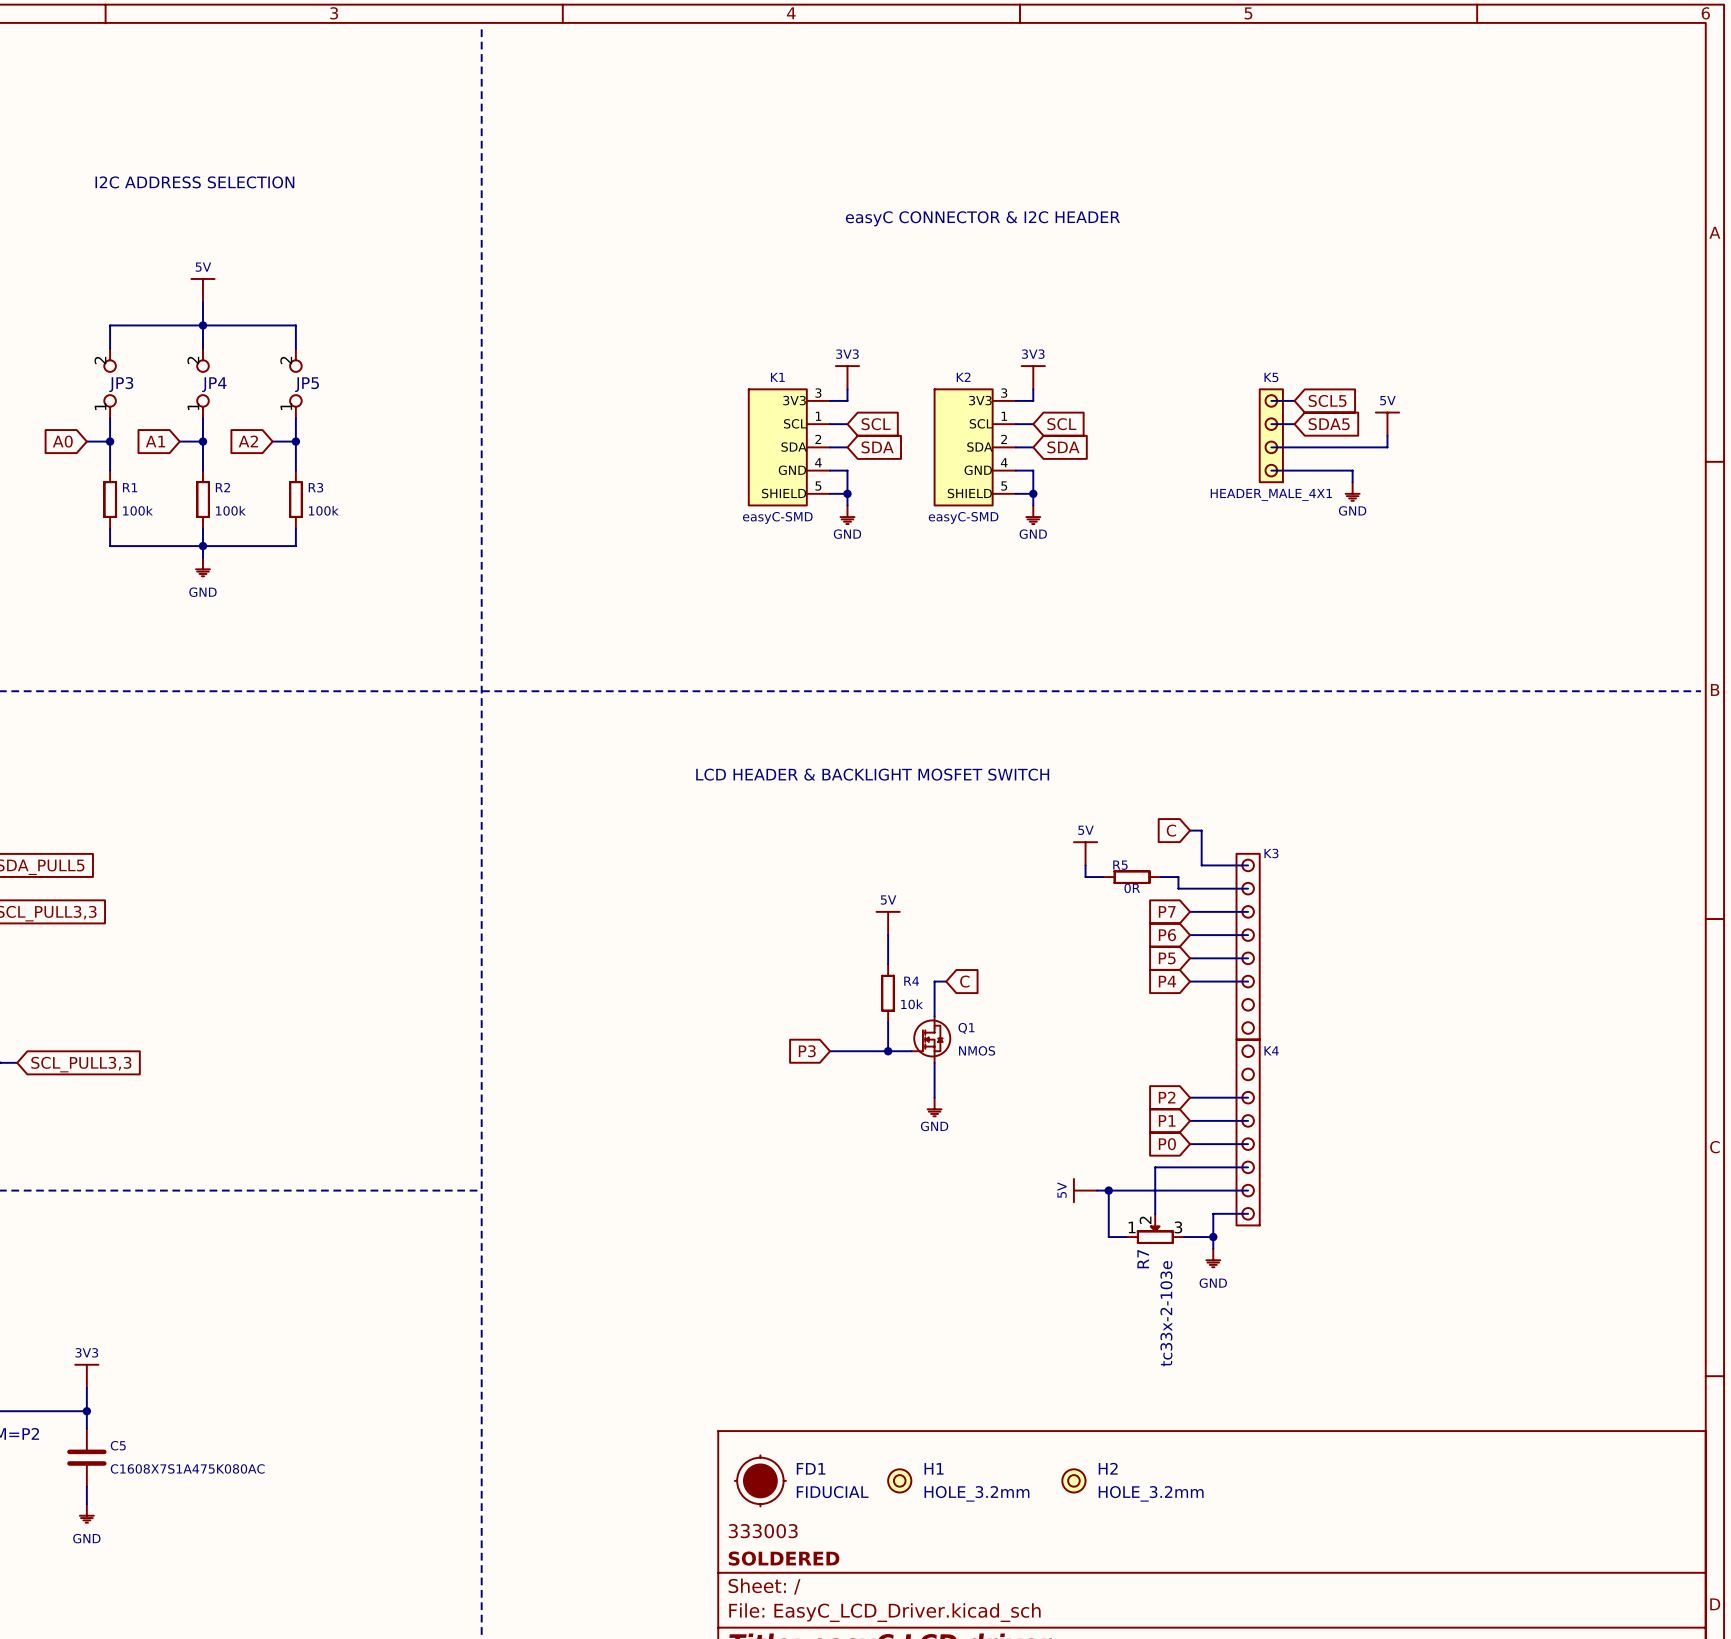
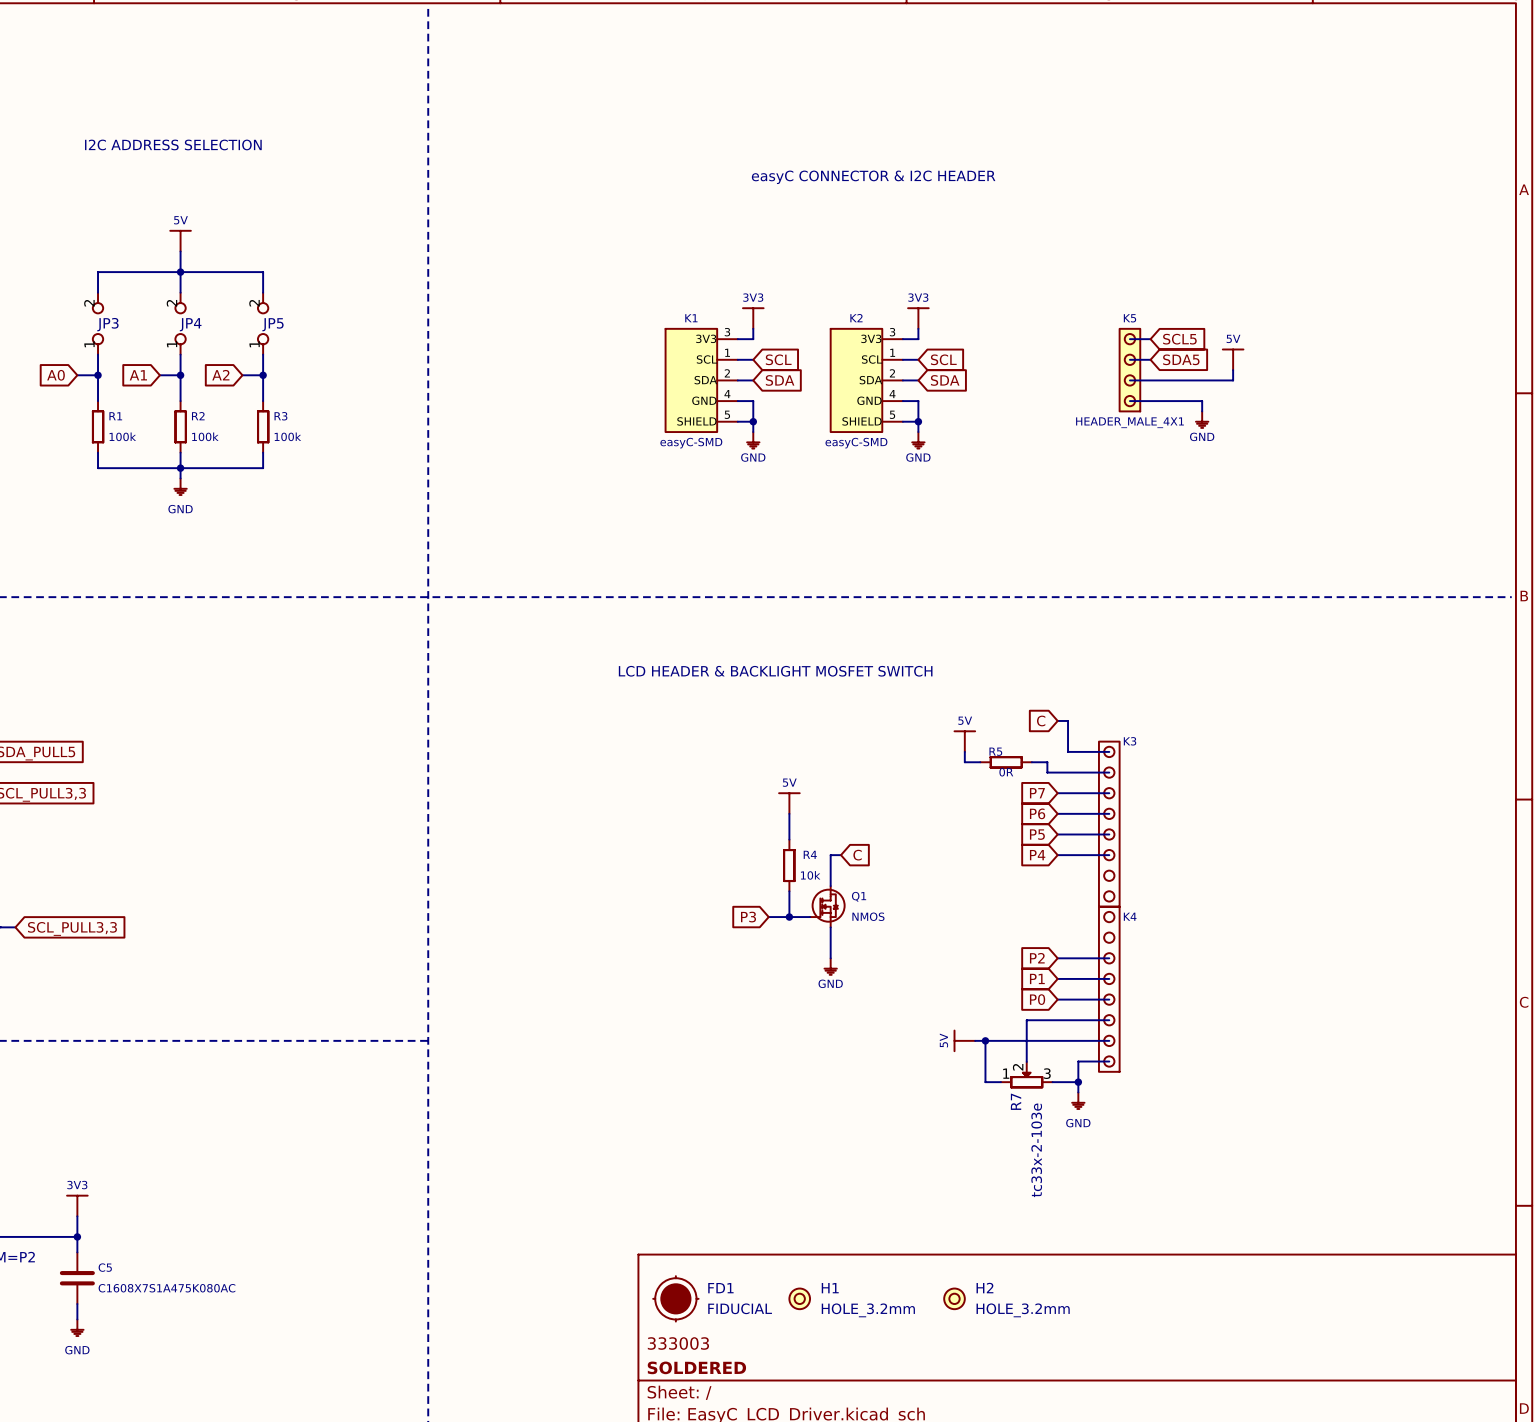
global label position: P3 (807, 1051) -> P3 (748, 917)
wire: (830, 1051) (864, 1051) -> none

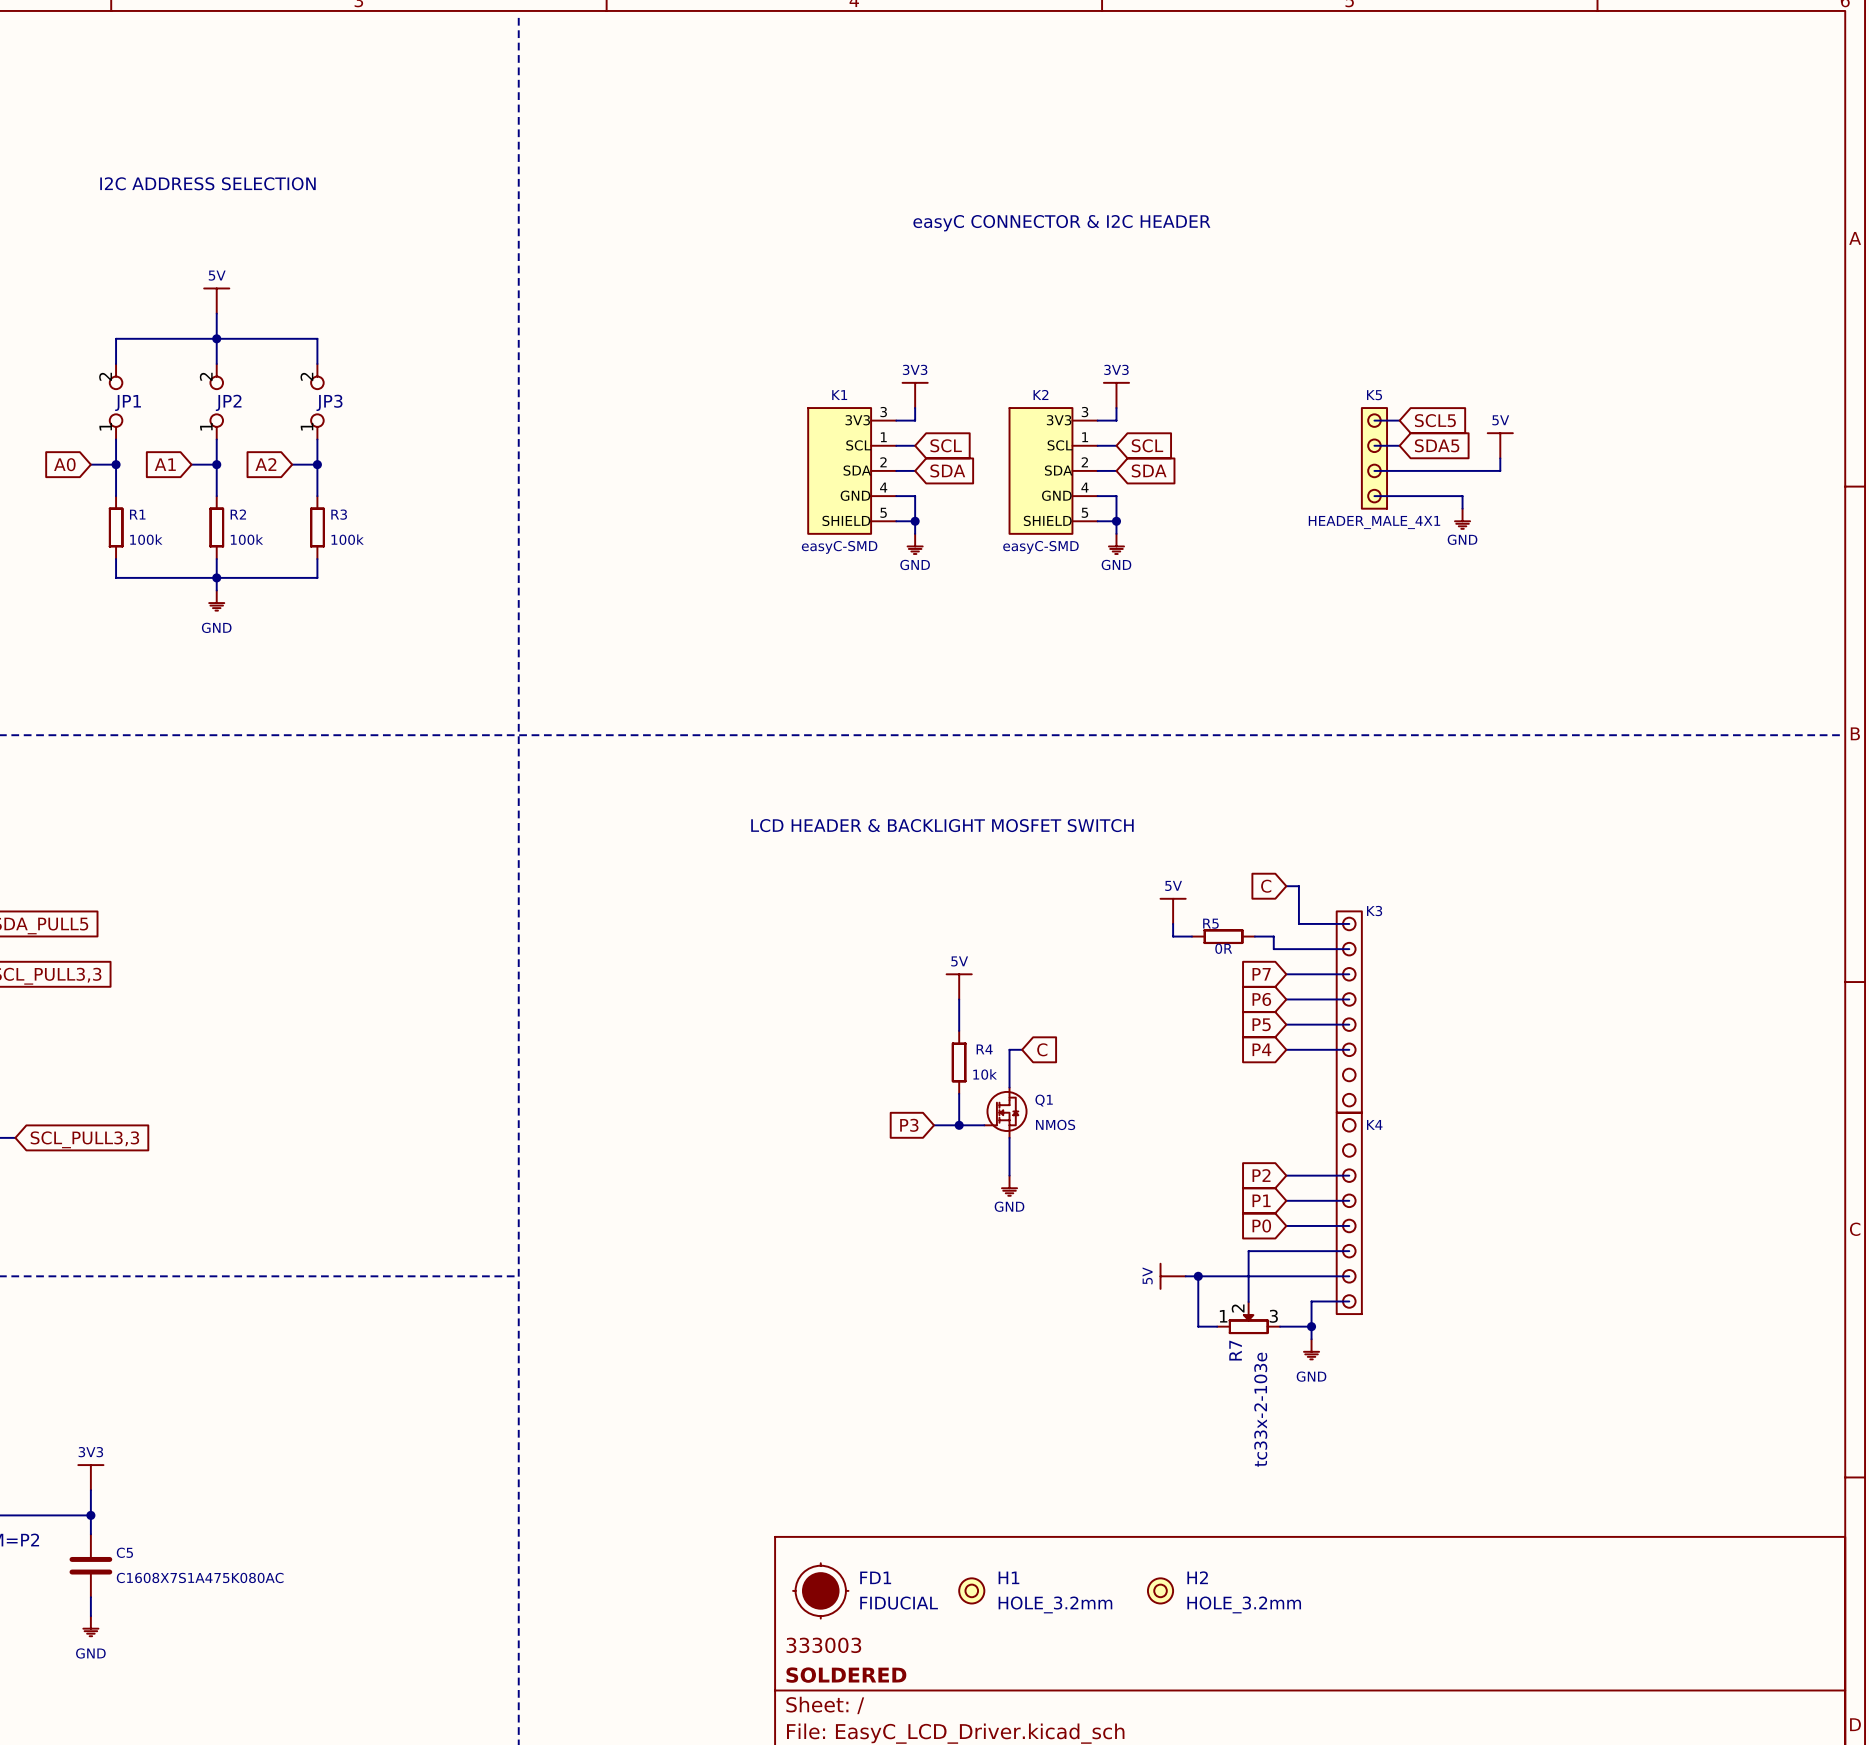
JP3 name: JP3 (107, 324) -> JP1 (128, 402)
JP4 name: JP4 (190, 324) -> JP2 (228, 402)
JP5 name: JP5 (272, 324) -> JP3 (329, 402)

